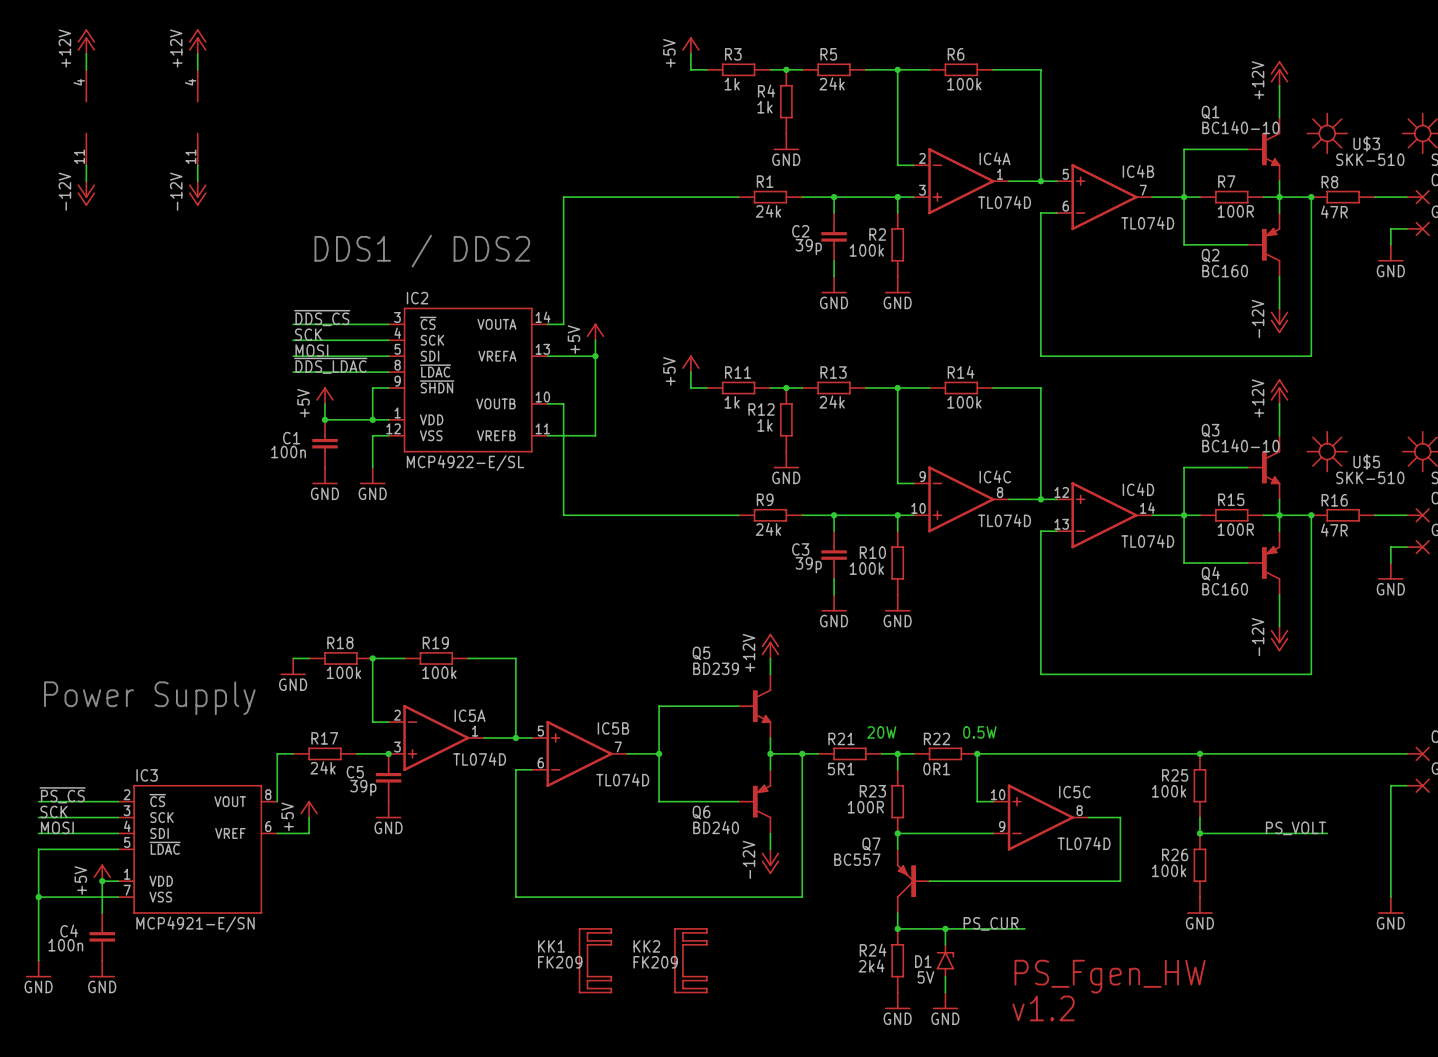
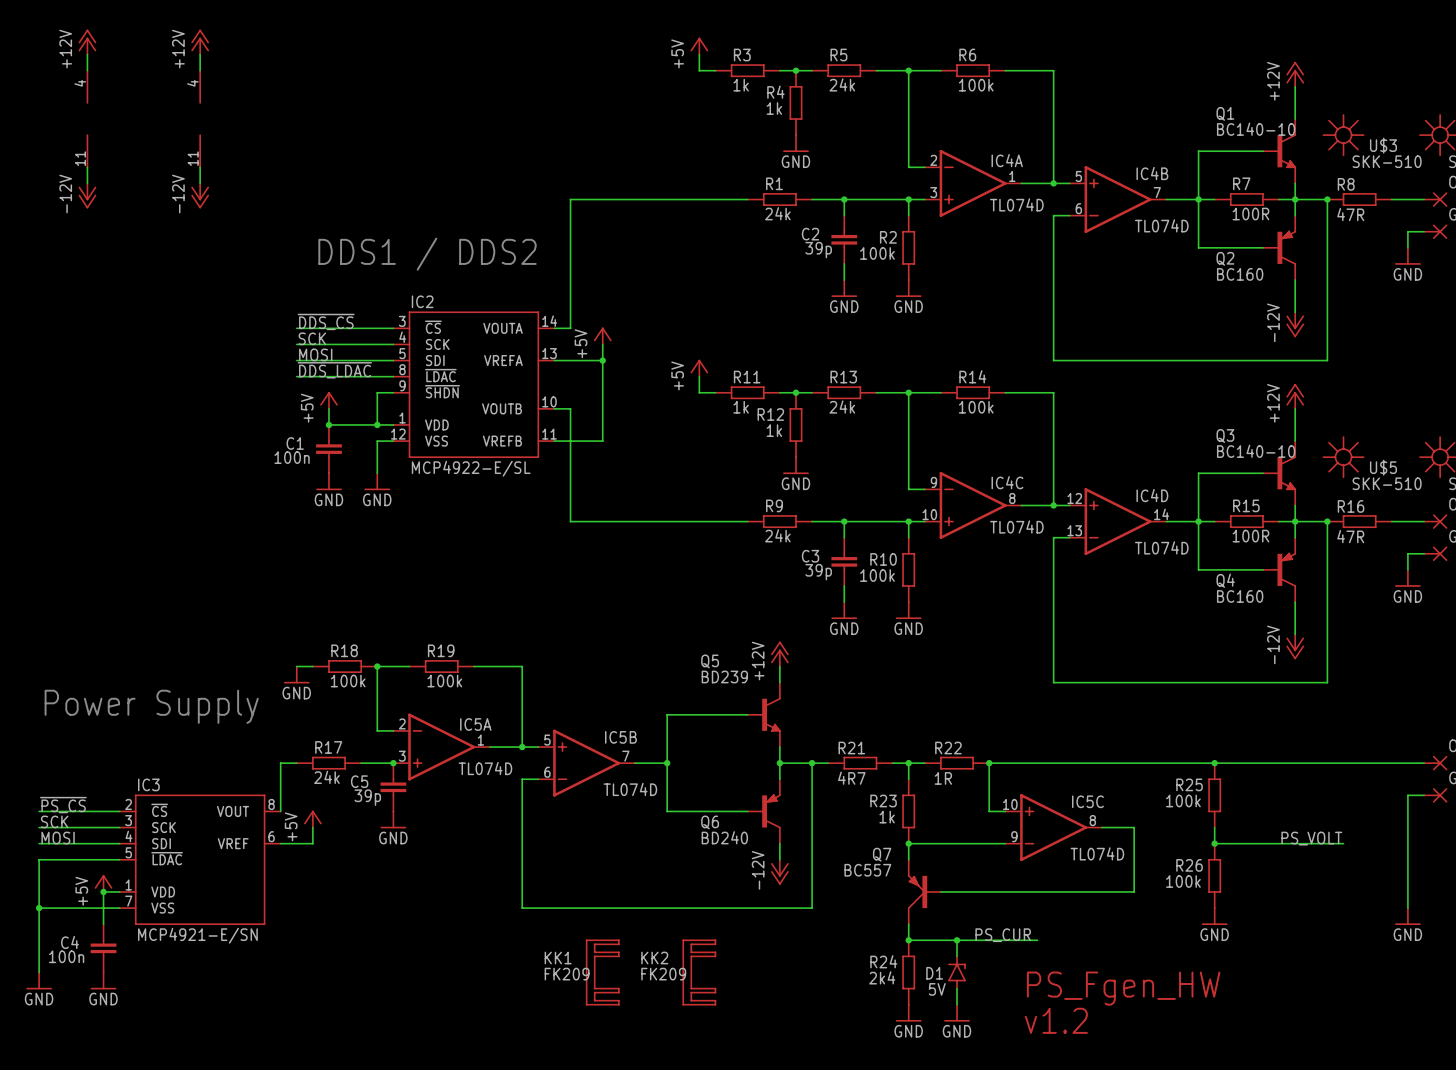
text: 20W (881, 732) -> none
text: 0.5W (979, 732) -> none
R21 value: 5R1 (841, 769) -> 4R7 (851, 778)
R22 value: 0R1 (936, 769) -> 1R (943, 778)
R23 value: 100R (865, 807) -> 1k (887, 817)

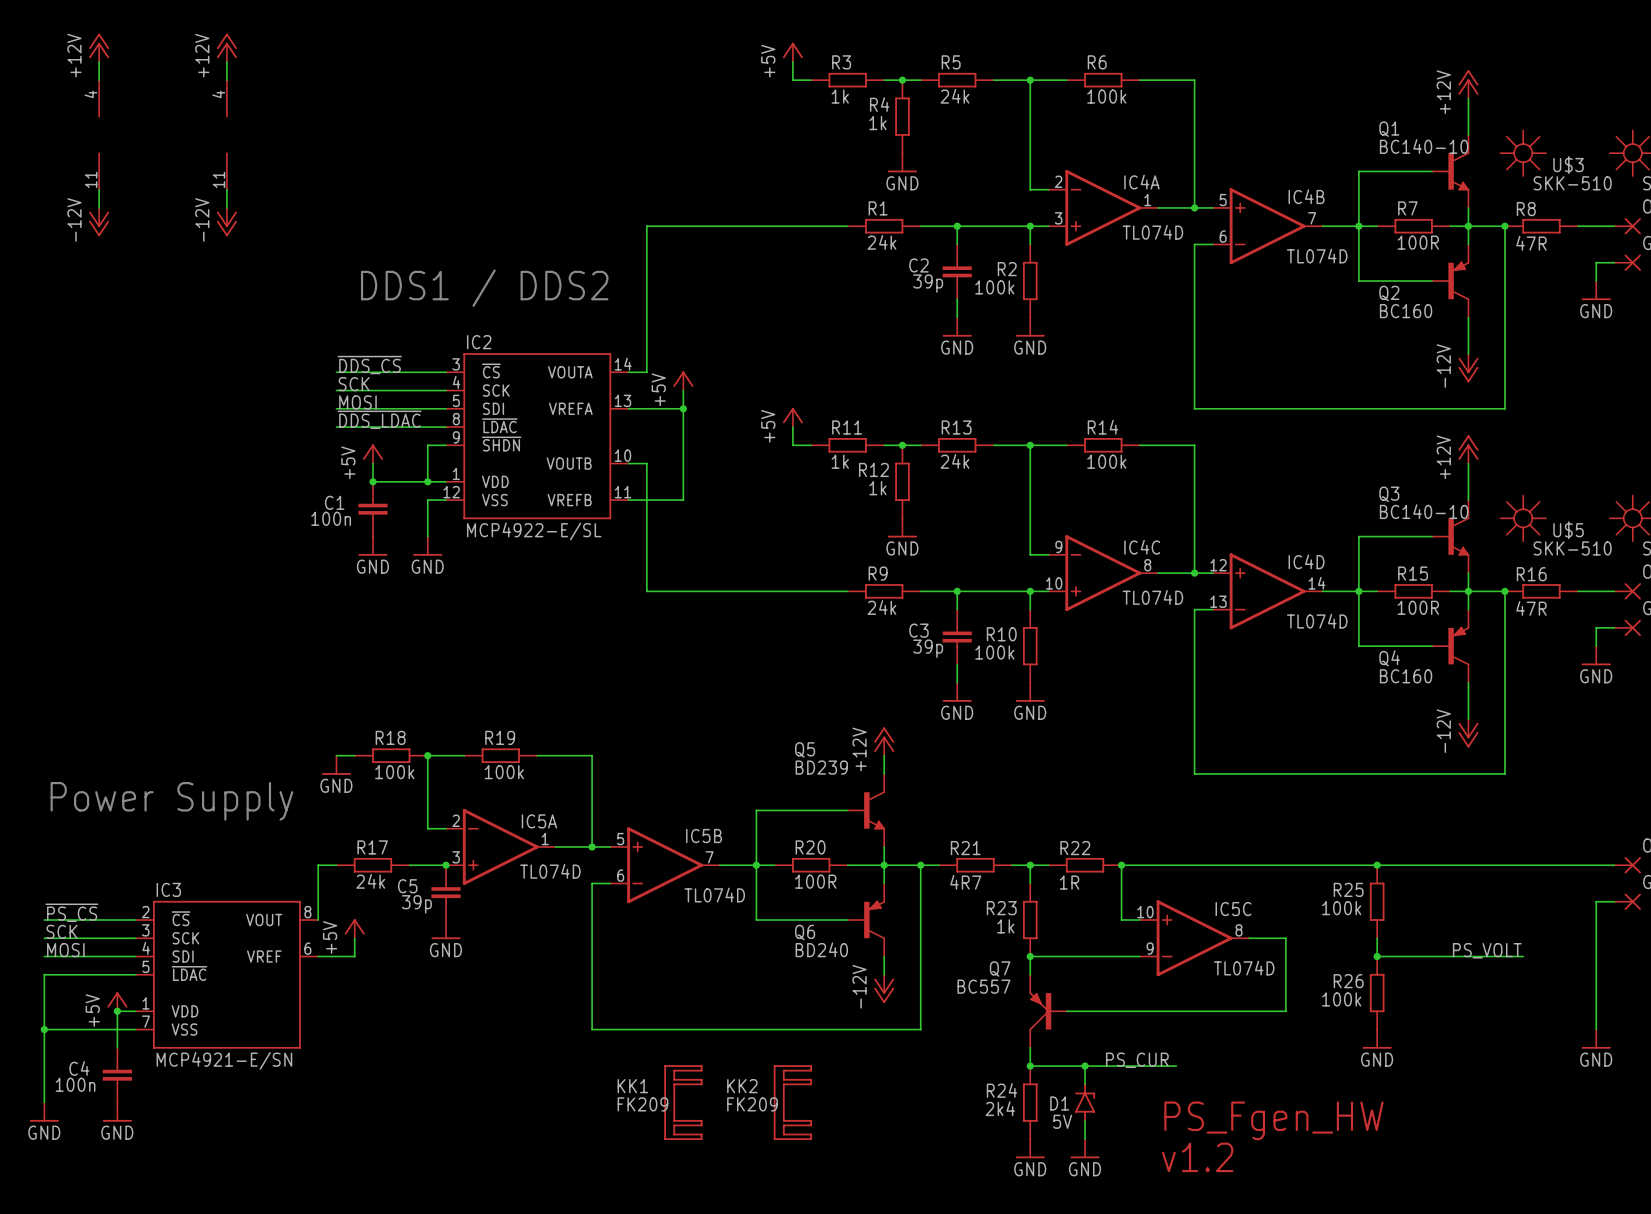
wire: none -> (756, 865) (774, 865)
R20: none -> 100R (811, 865)
wire: none -> (847, 865) (884, 865)

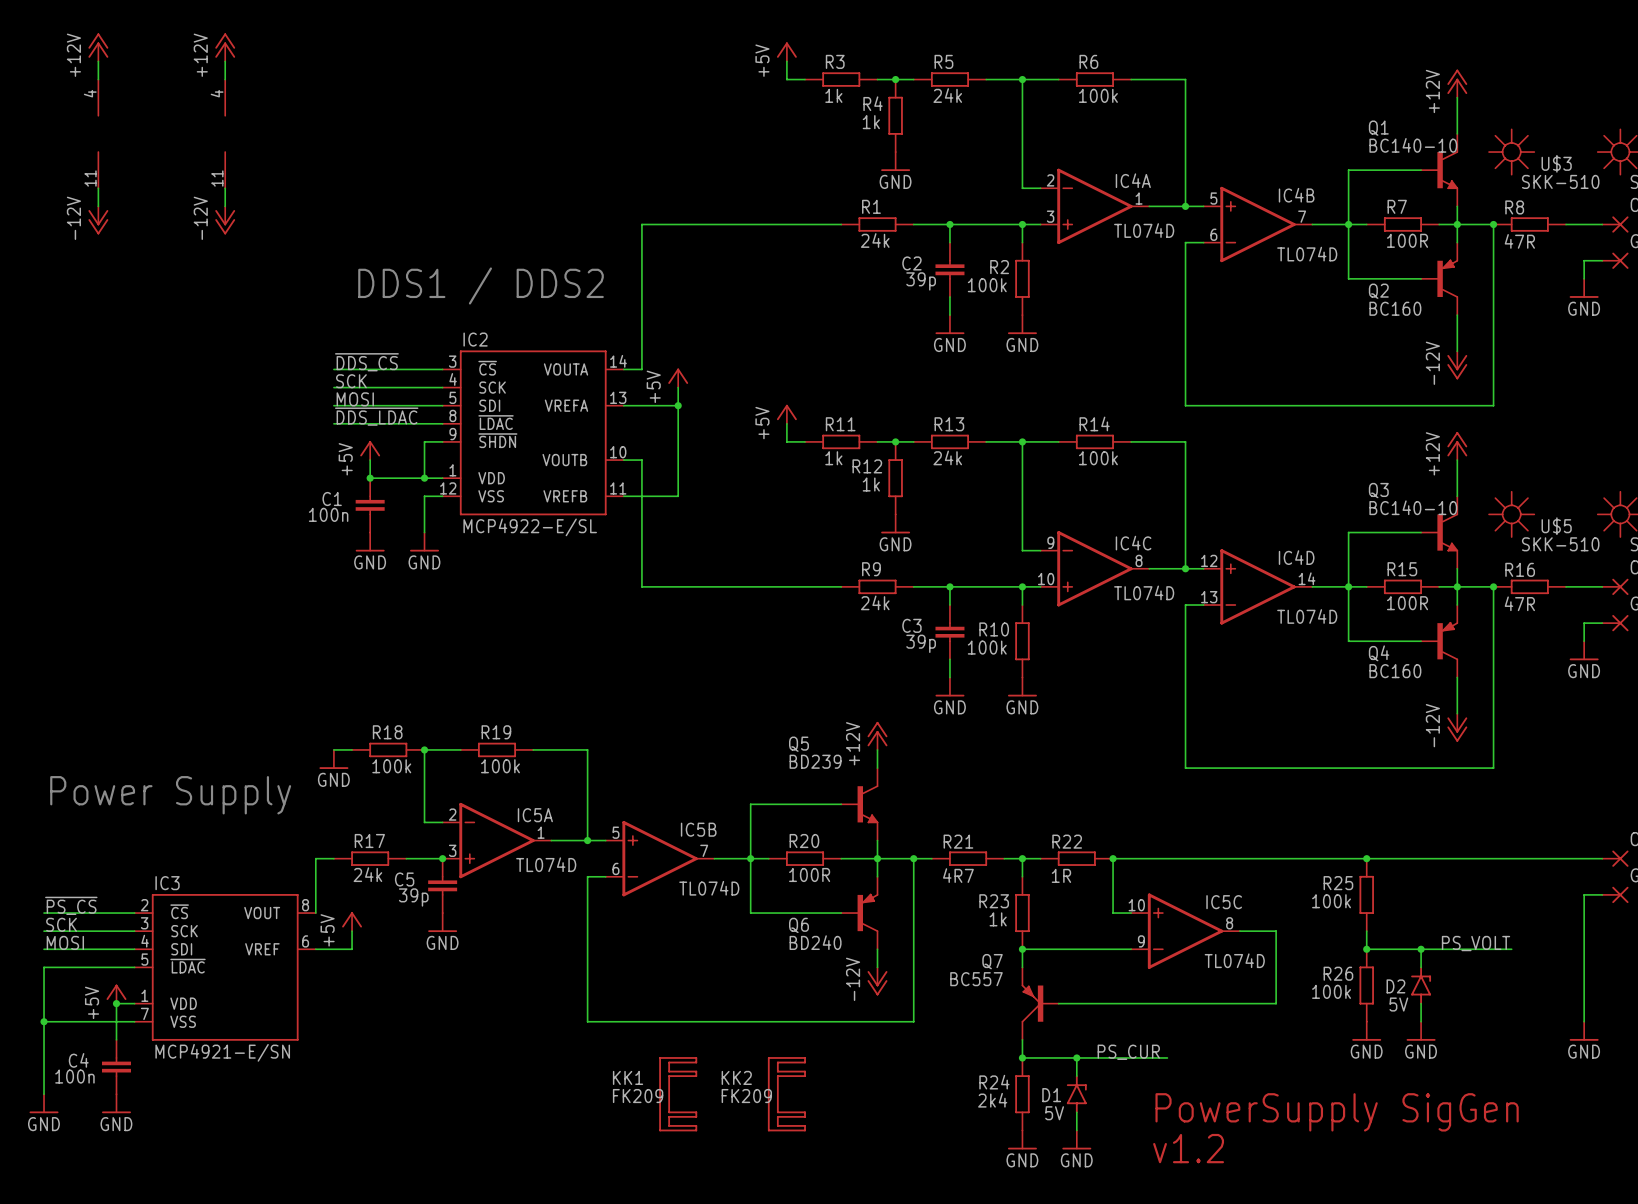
wire: none -> (1421, 949) (1421, 967)
junction: none -> (1421, 949)
D2: none -> 5V (1421, 985)
wire: none -> (1421, 1003) (1421, 1021)
power symbol: none -> GND (1421, 1031)
text: PS_Fgen_HW (1273, 1120) -> PowerSupply SigGen (1337, 1112)

